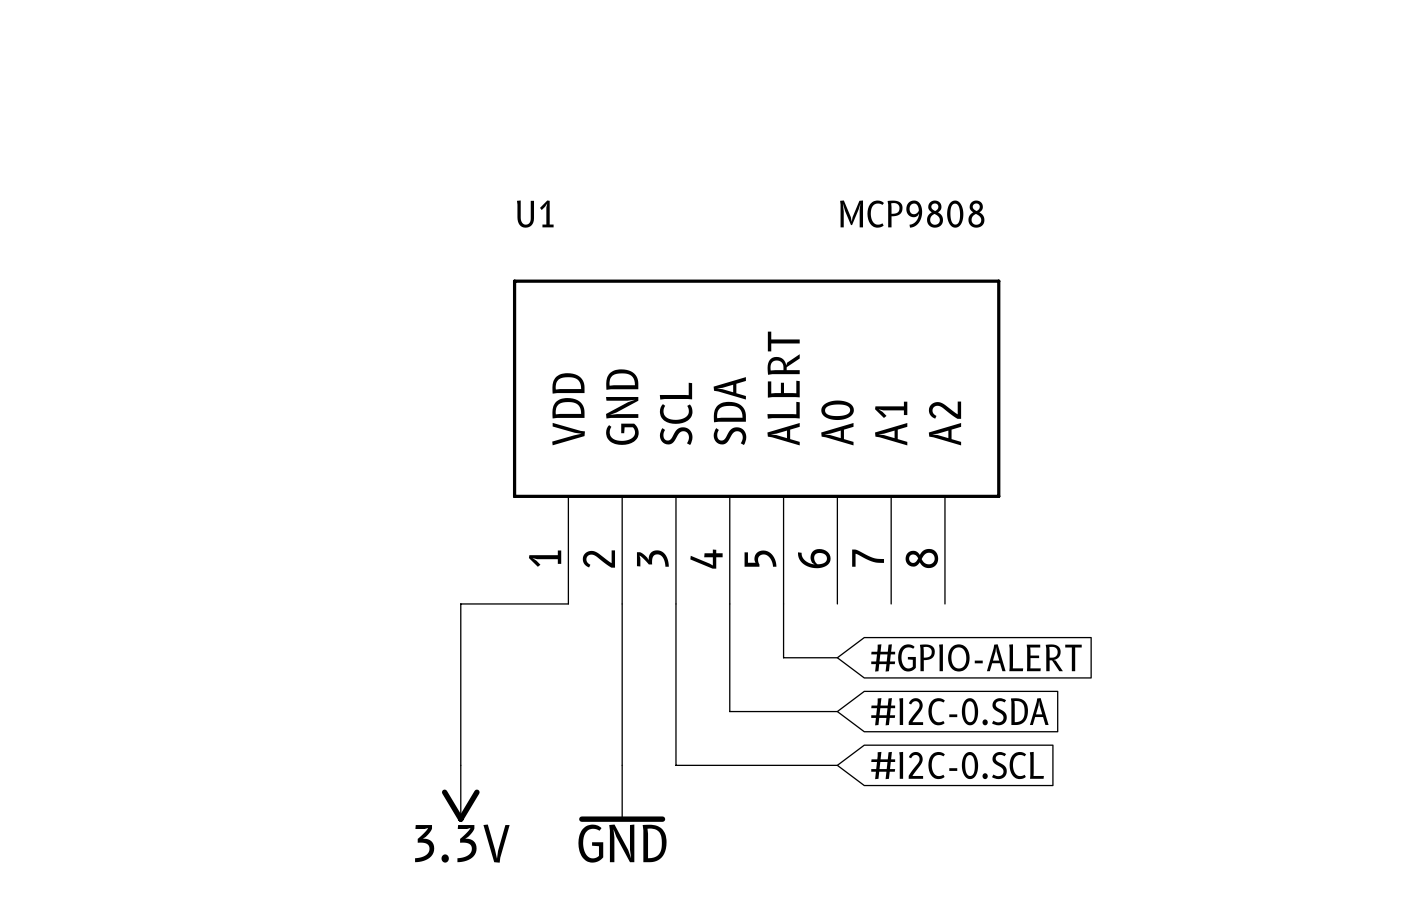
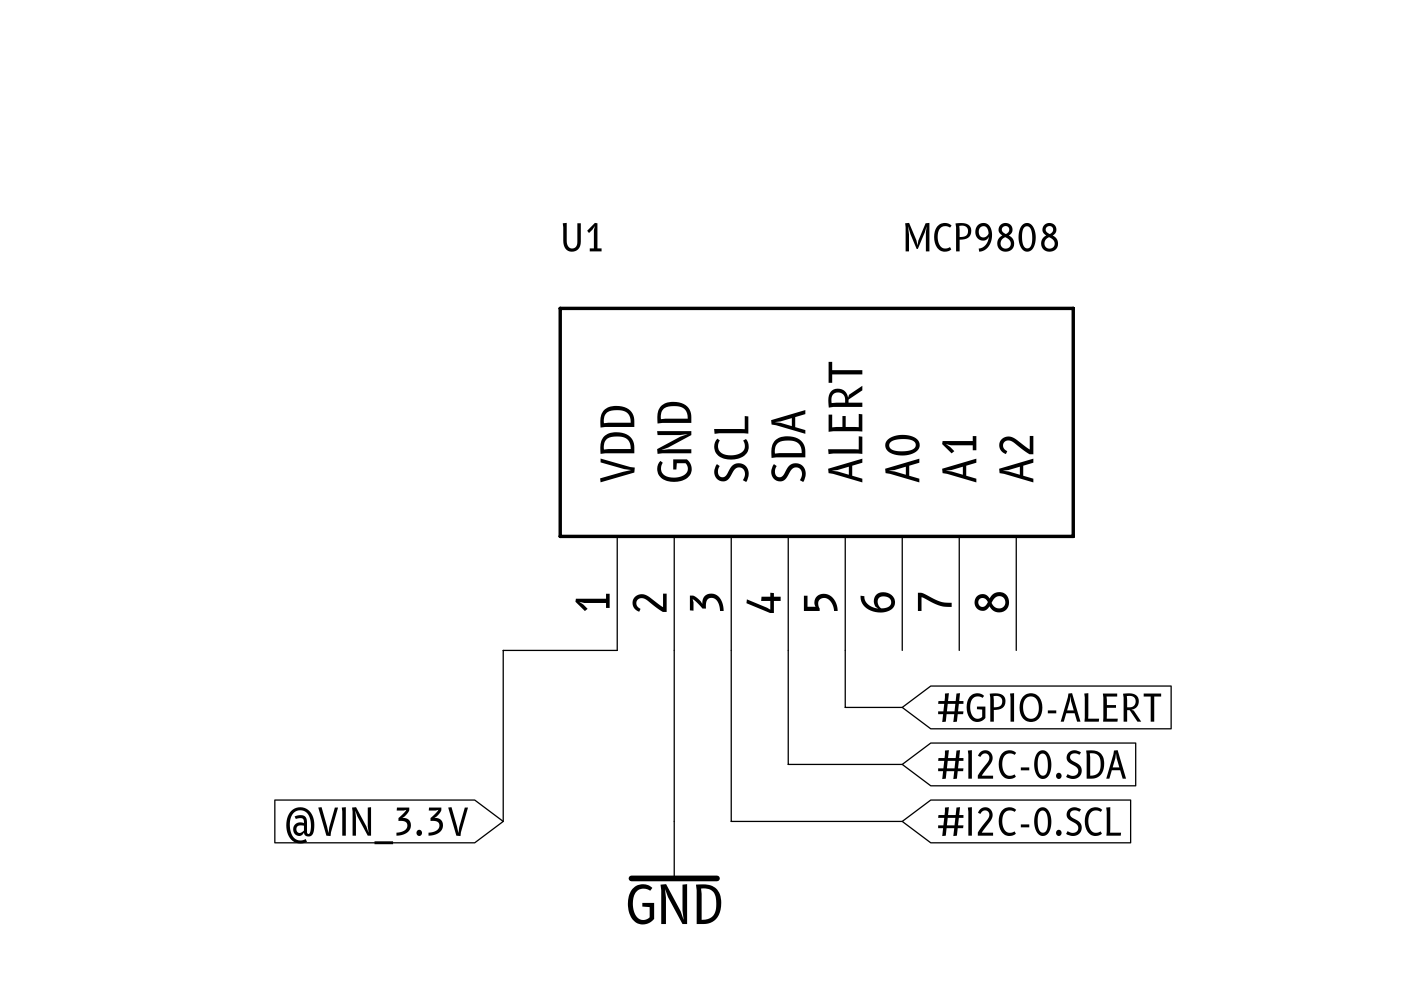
global label: none -> @VIN_3.3V (377, 825)
power symbol: 3.3V (460, 793) -> none

